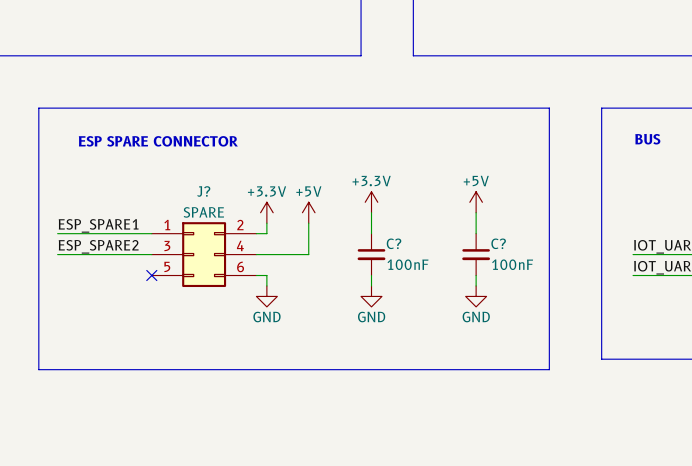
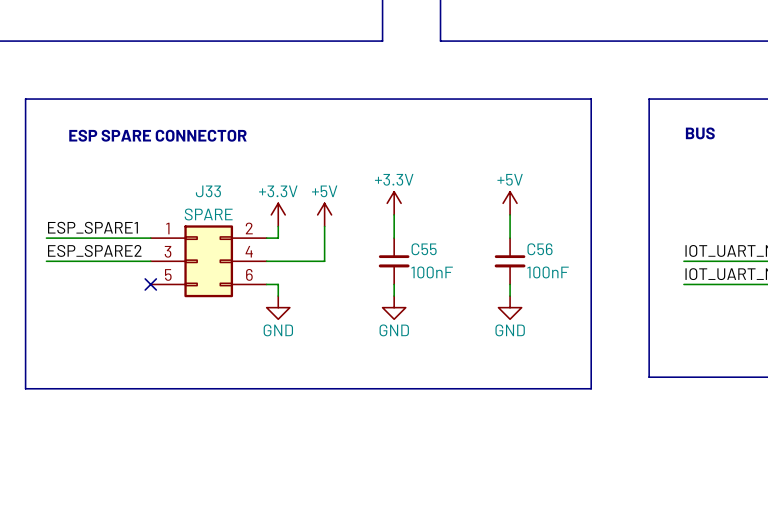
J? name: J? (203, 191) -> J33 (208, 191)
C? name: C? (394, 243) -> C55 (424, 249)
C? name: C? (498, 243) -> C56 (540, 249)

